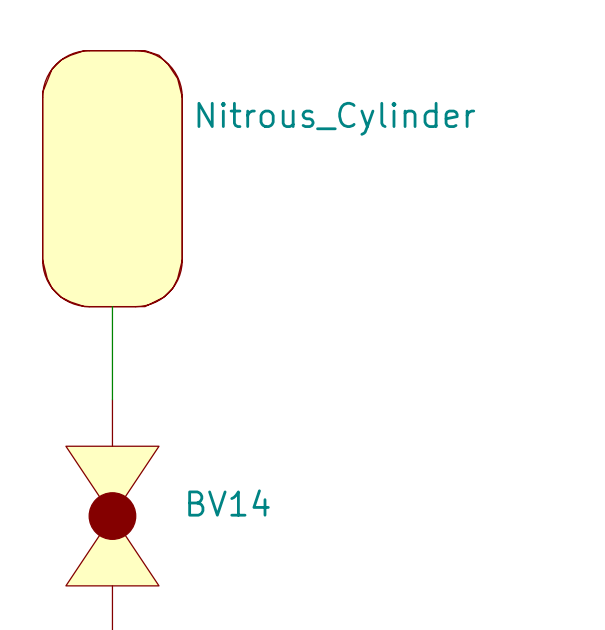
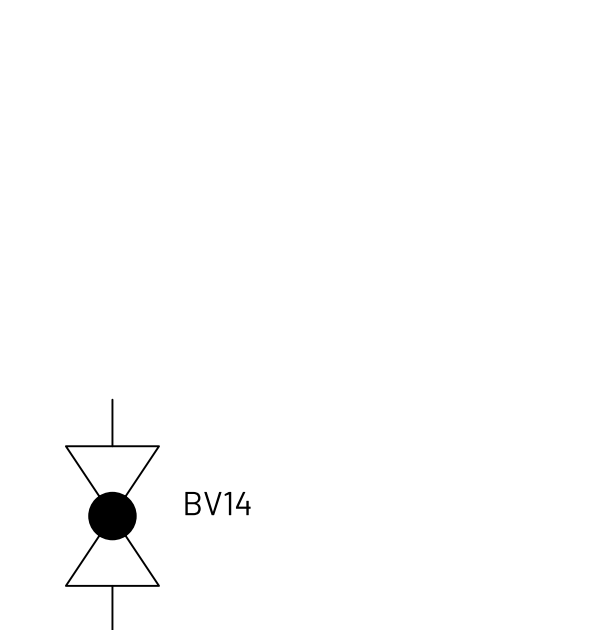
Nitrous_Cylinder: (112, 178) -> none
wire: (112, 306) (112, 399) -> none

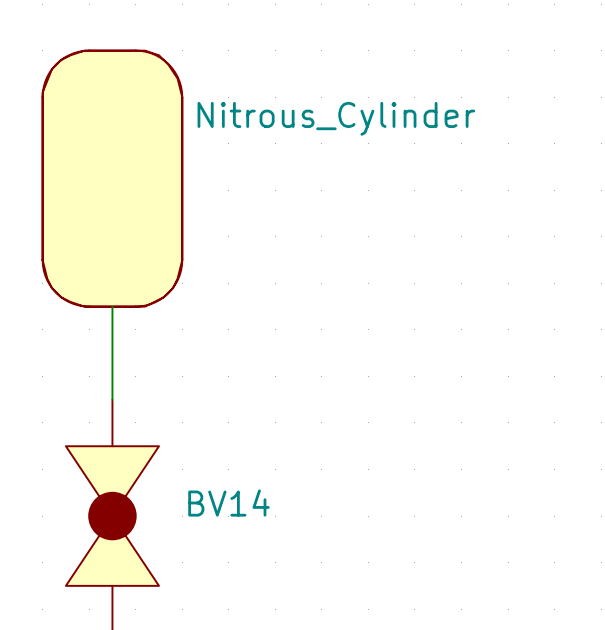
Nitrous_Cylinder: none -> (112, 178)
wire: none -> (112, 306) (112, 399)

